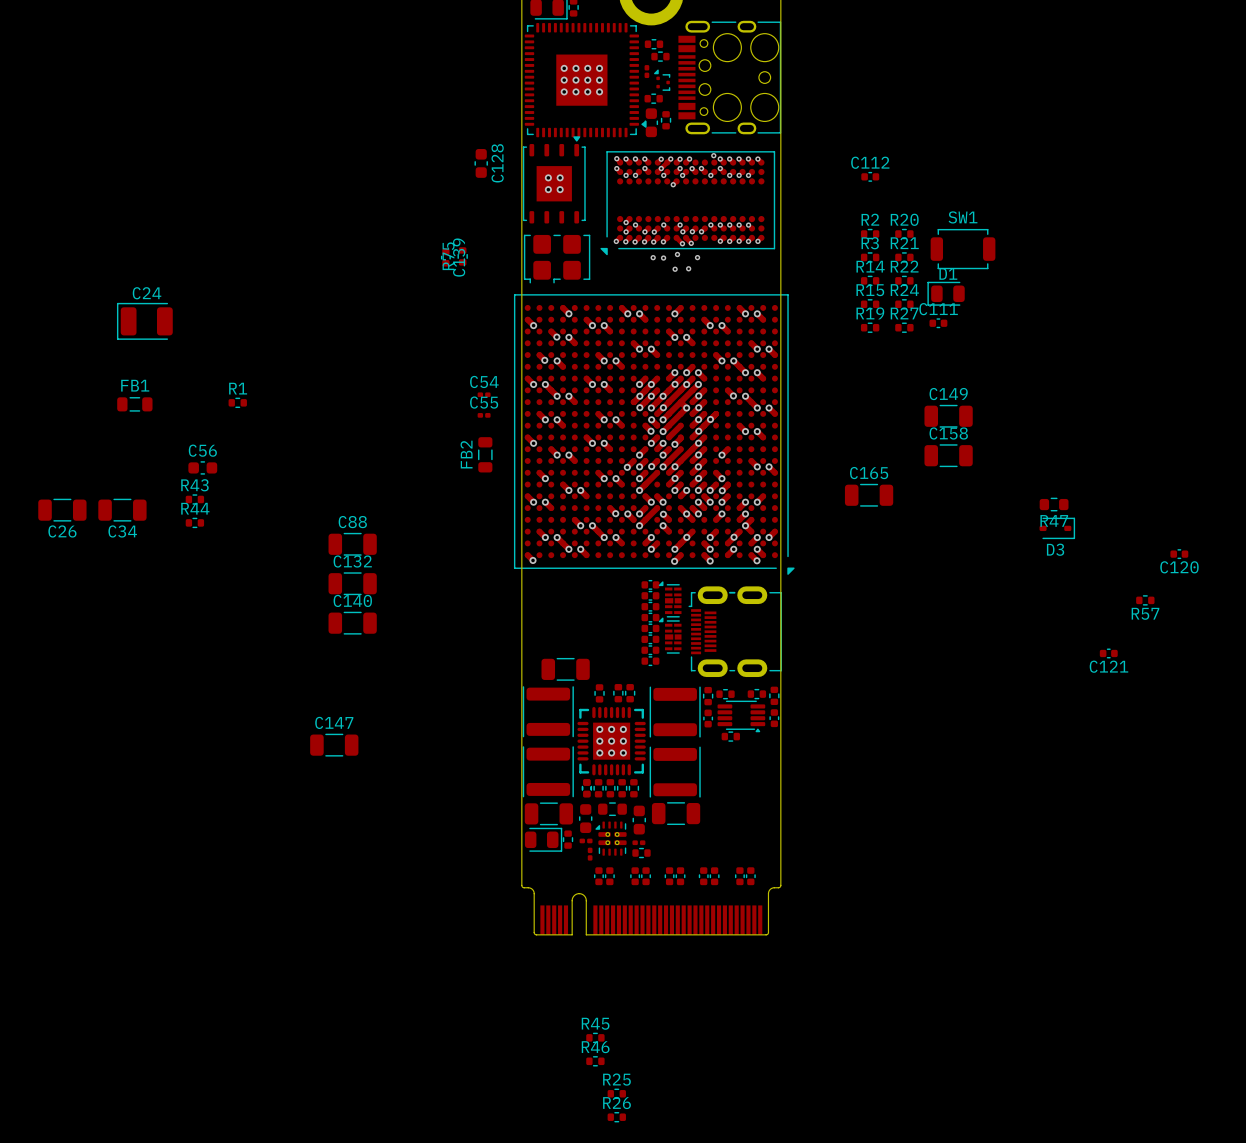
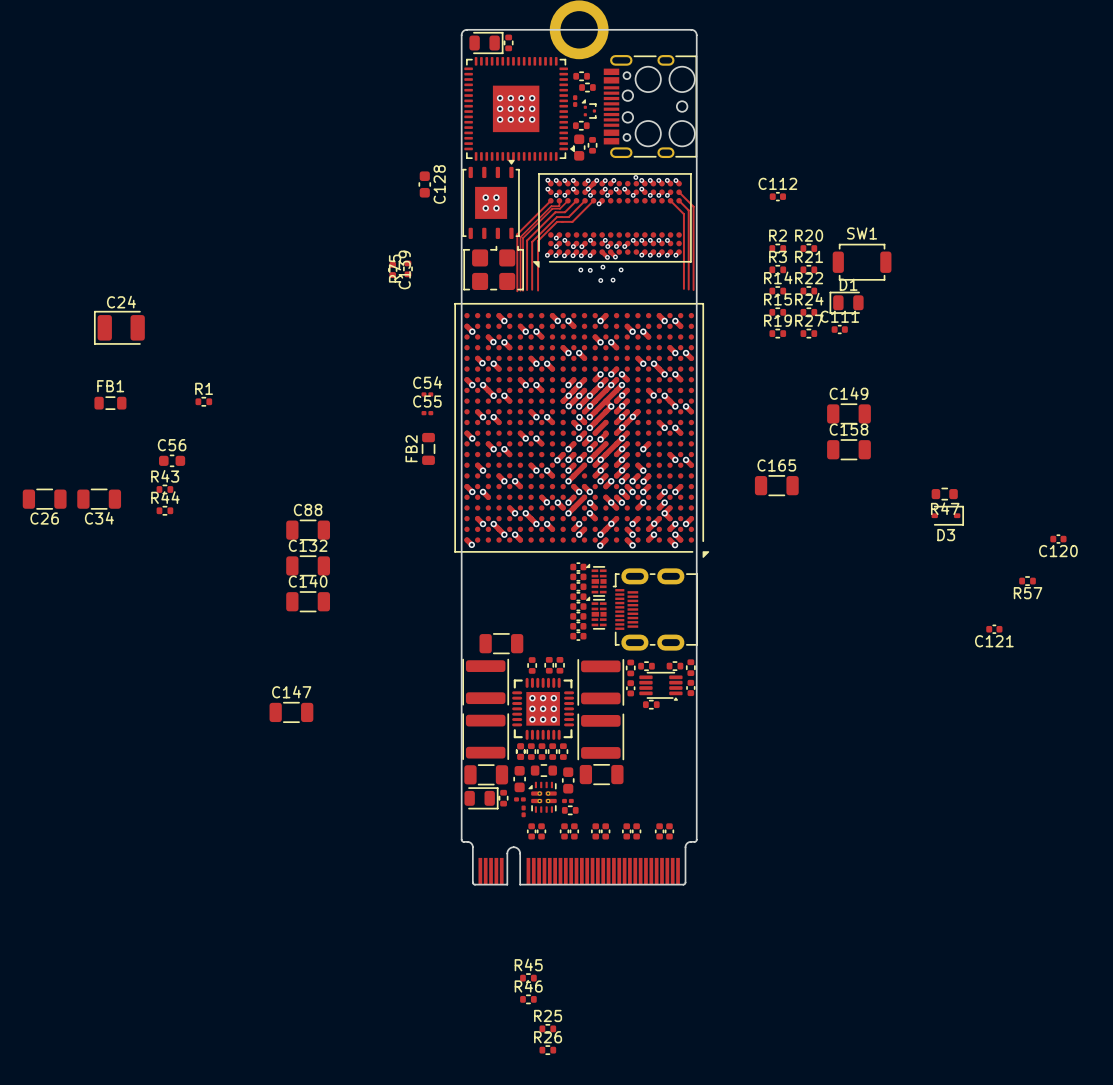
track: none -> (679, 192) (693, 206) (693, 289)
track: none -> (550, 200) (517, 234) (517, 291)
track: none -> (559, 200) (559, 206) (551, 206) (520, 237) (520, 290)
track: none -> (567, 200) (560, 208) (552, 208) (522, 238) (522, 290)
track: none -> (576, 200) (565, 212) (555, 212) (527, 240) (527, 289)
track: none -> (585, 200) (568, 217) (557, 217) (532, 241) (532, 289)
track: none -> (593, 200) (572, 221) (557, 221) (538, 240) (538, 290)
track: none -> (670, 200) (683, 214) (683, 288)
track: none -> (679, 200) (688, 210) (688, 289)
part rotation: 0° (557, 259) -> 180° (493, 268)

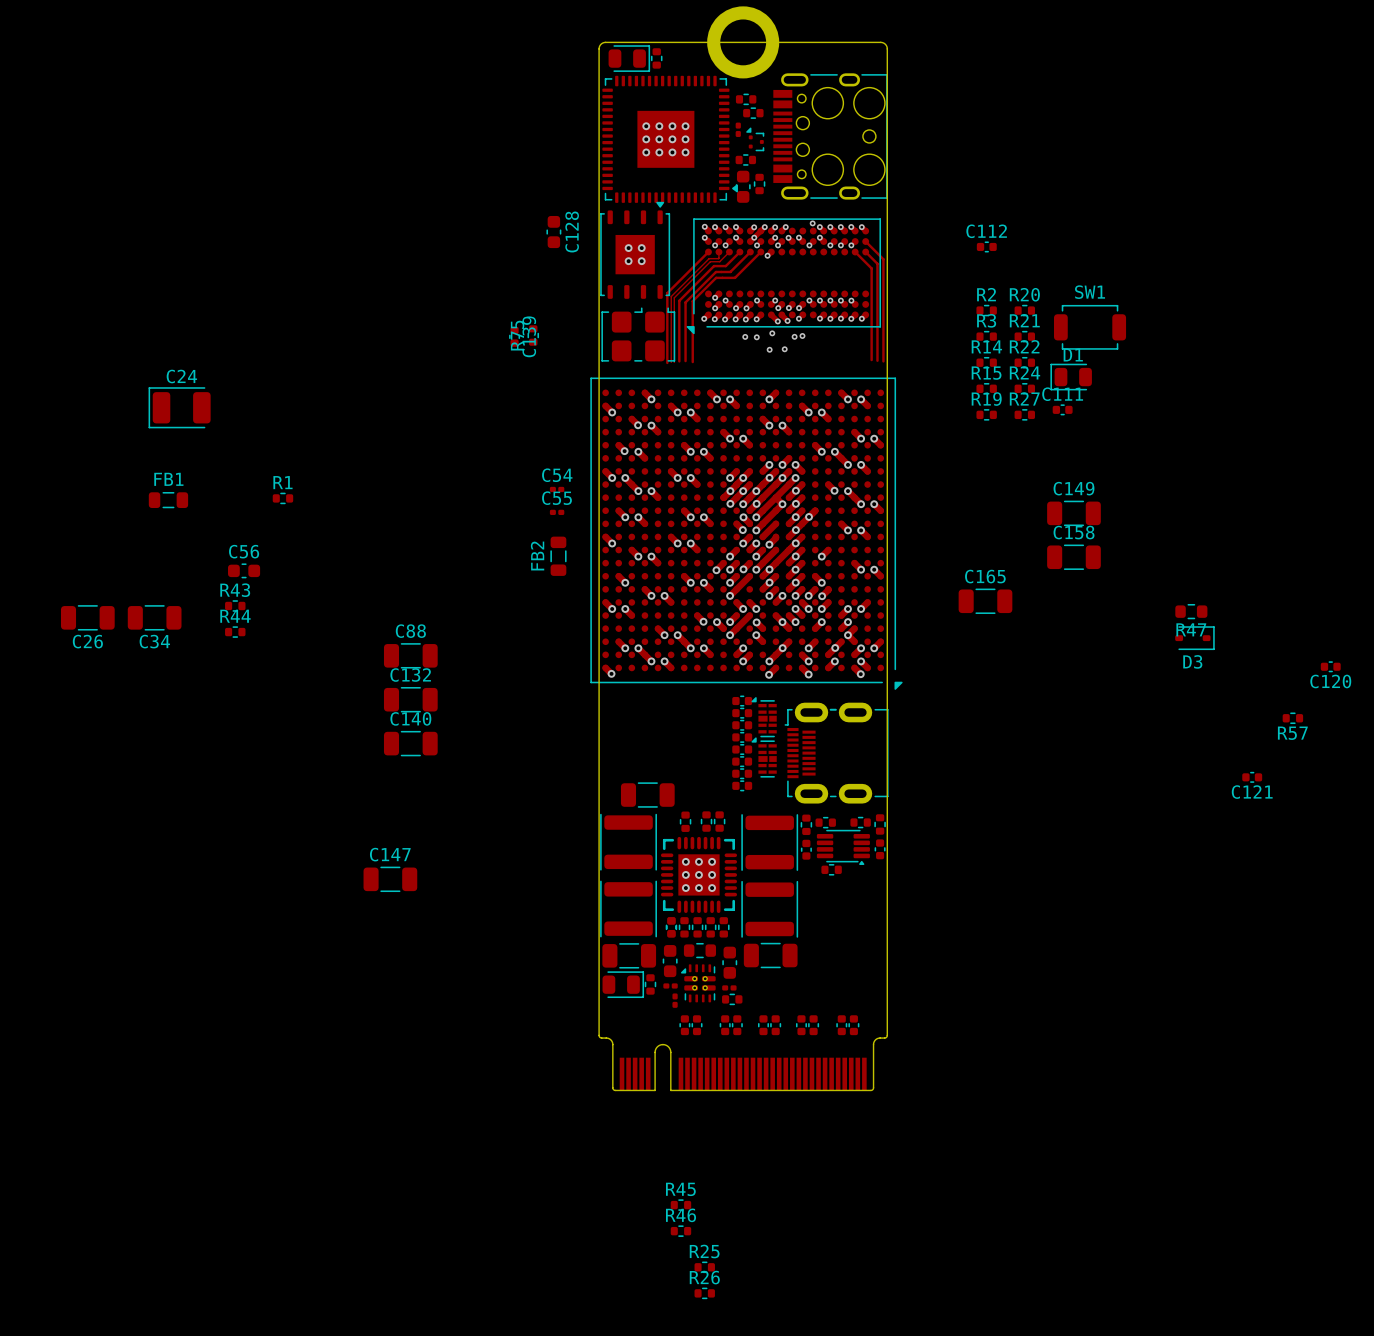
via: none -> (798, 318)
via: none -> (802, 335)

